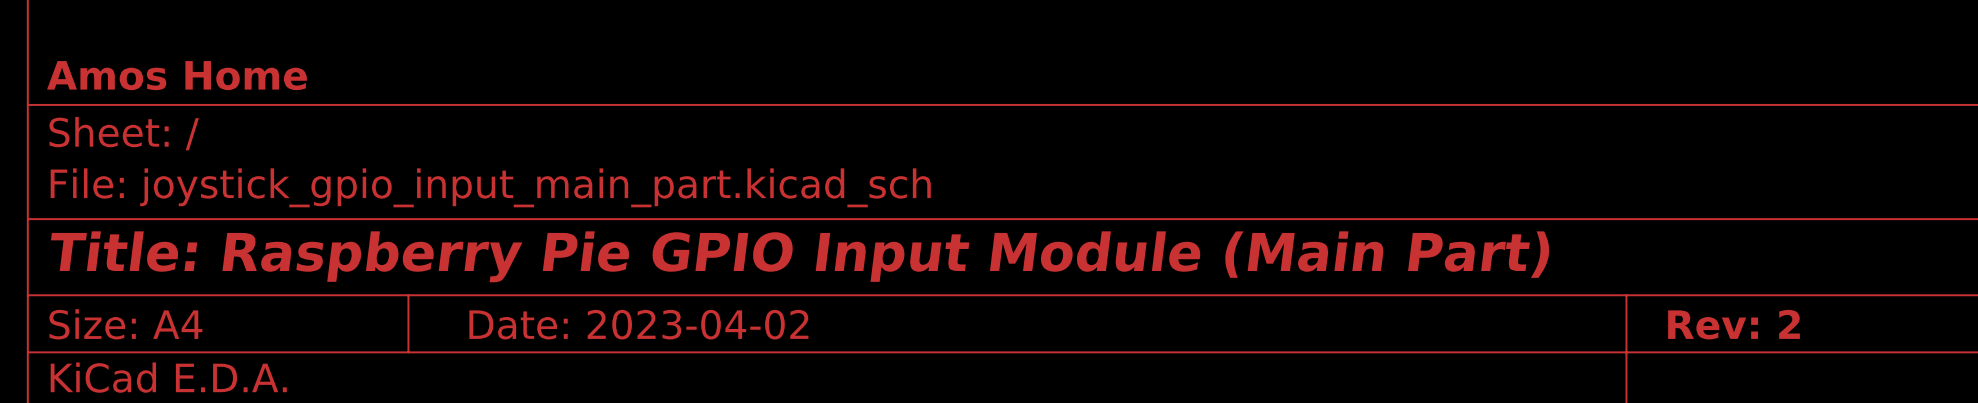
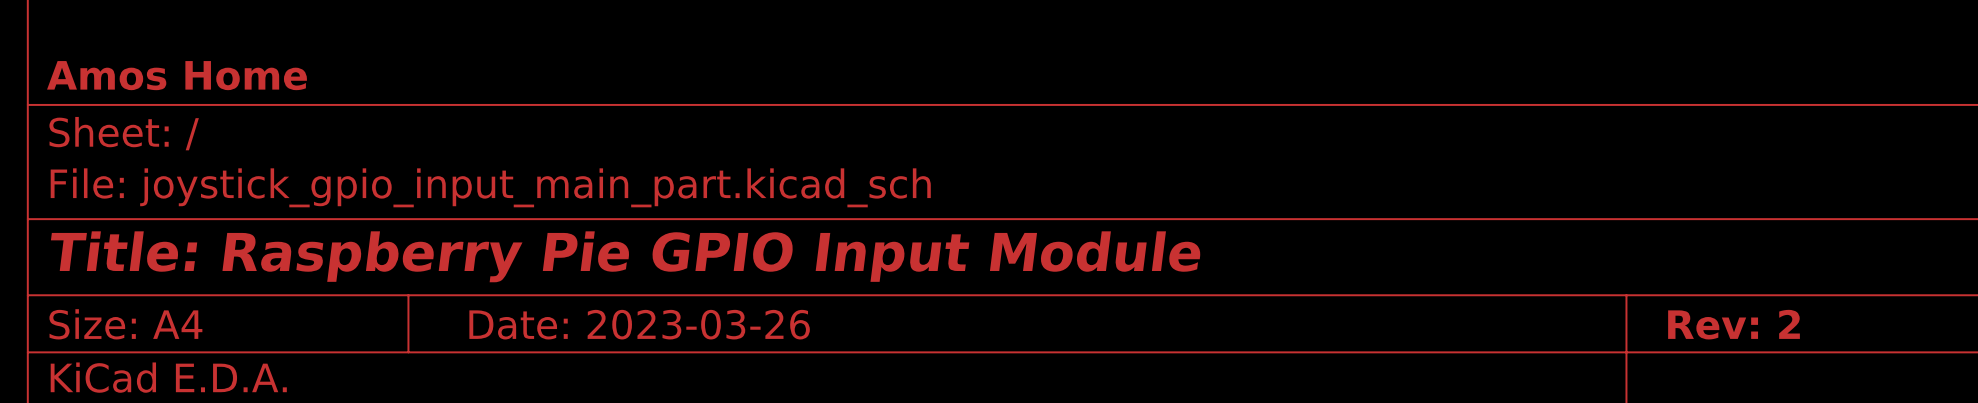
title block: Title: Raspberry Pie GPIO Input Module (Main Part) (800, 256) -> Title: Raspberry Pie GPIO Input Module (625, 256)
title block: Date: 2023-04-02 (638, 324) -> Date: 2023-03-26 (639, 324)

